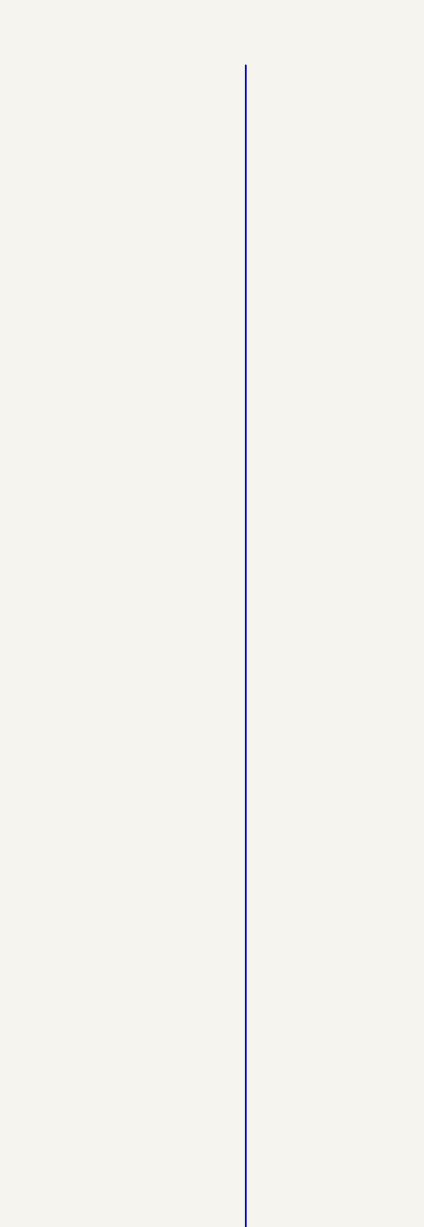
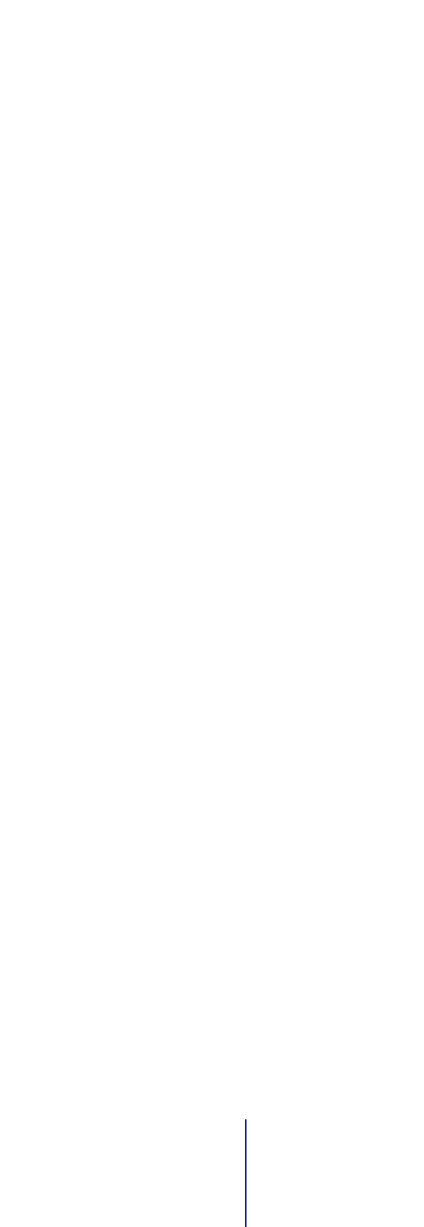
bus: (245, 65) (245, 1119) -> none

